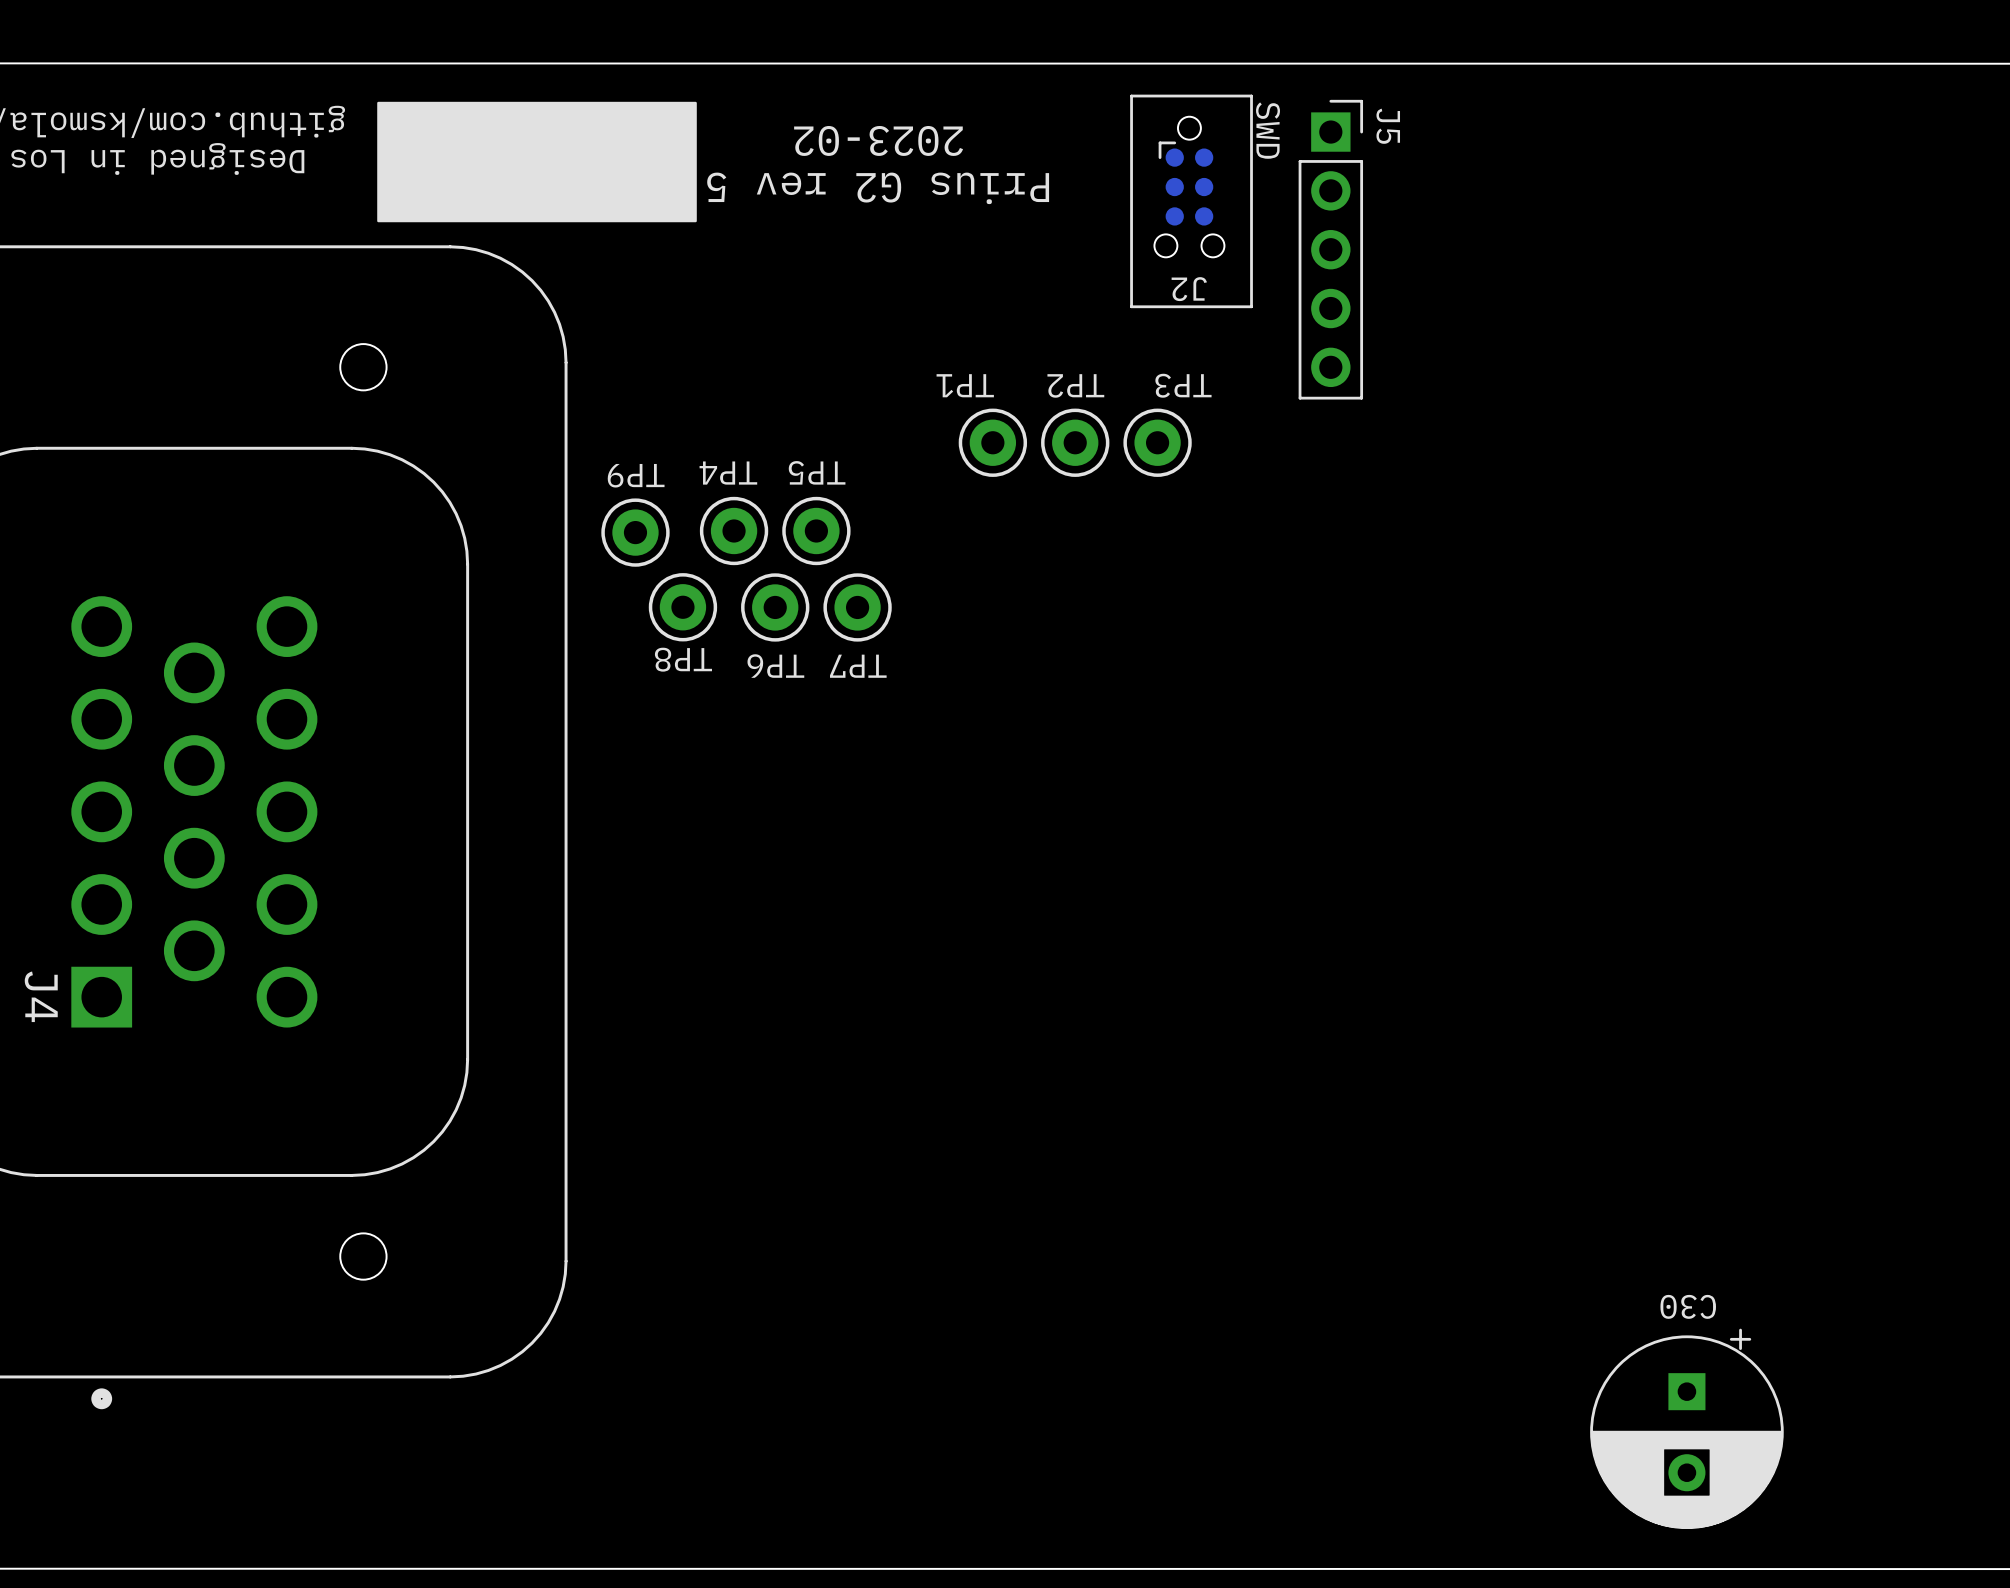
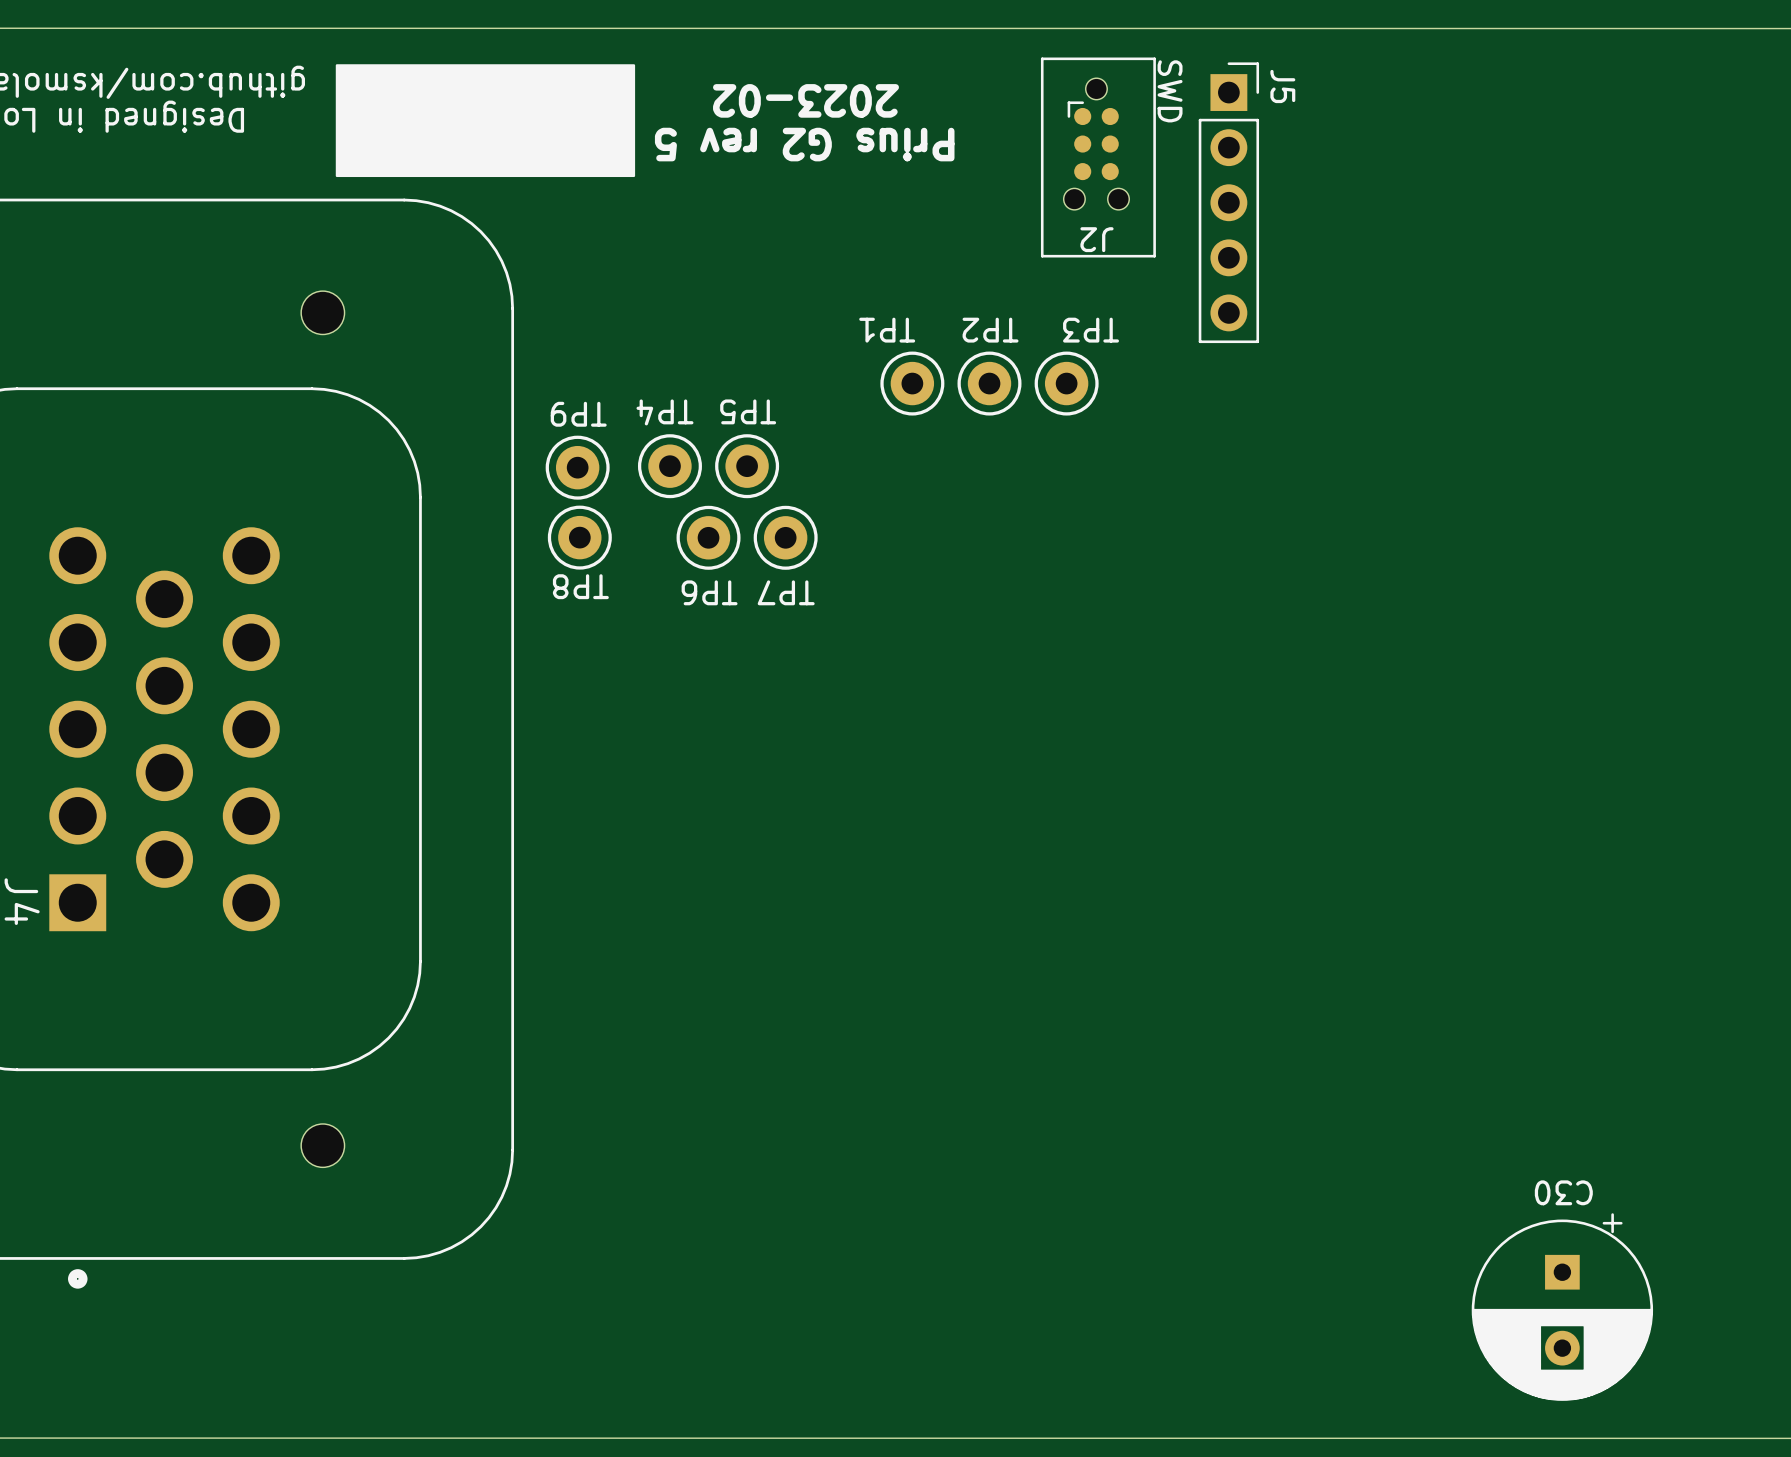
TP8 position: (682, 607) -> (579, 537)

